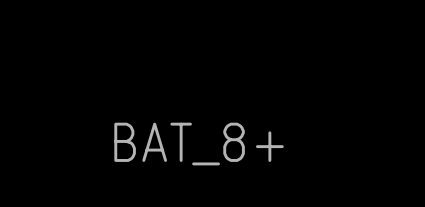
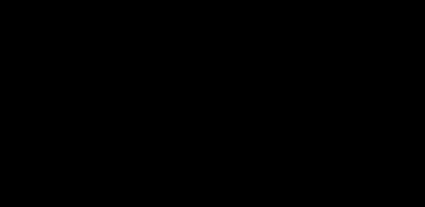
label: BAT_8+ (199, 144) -> none

